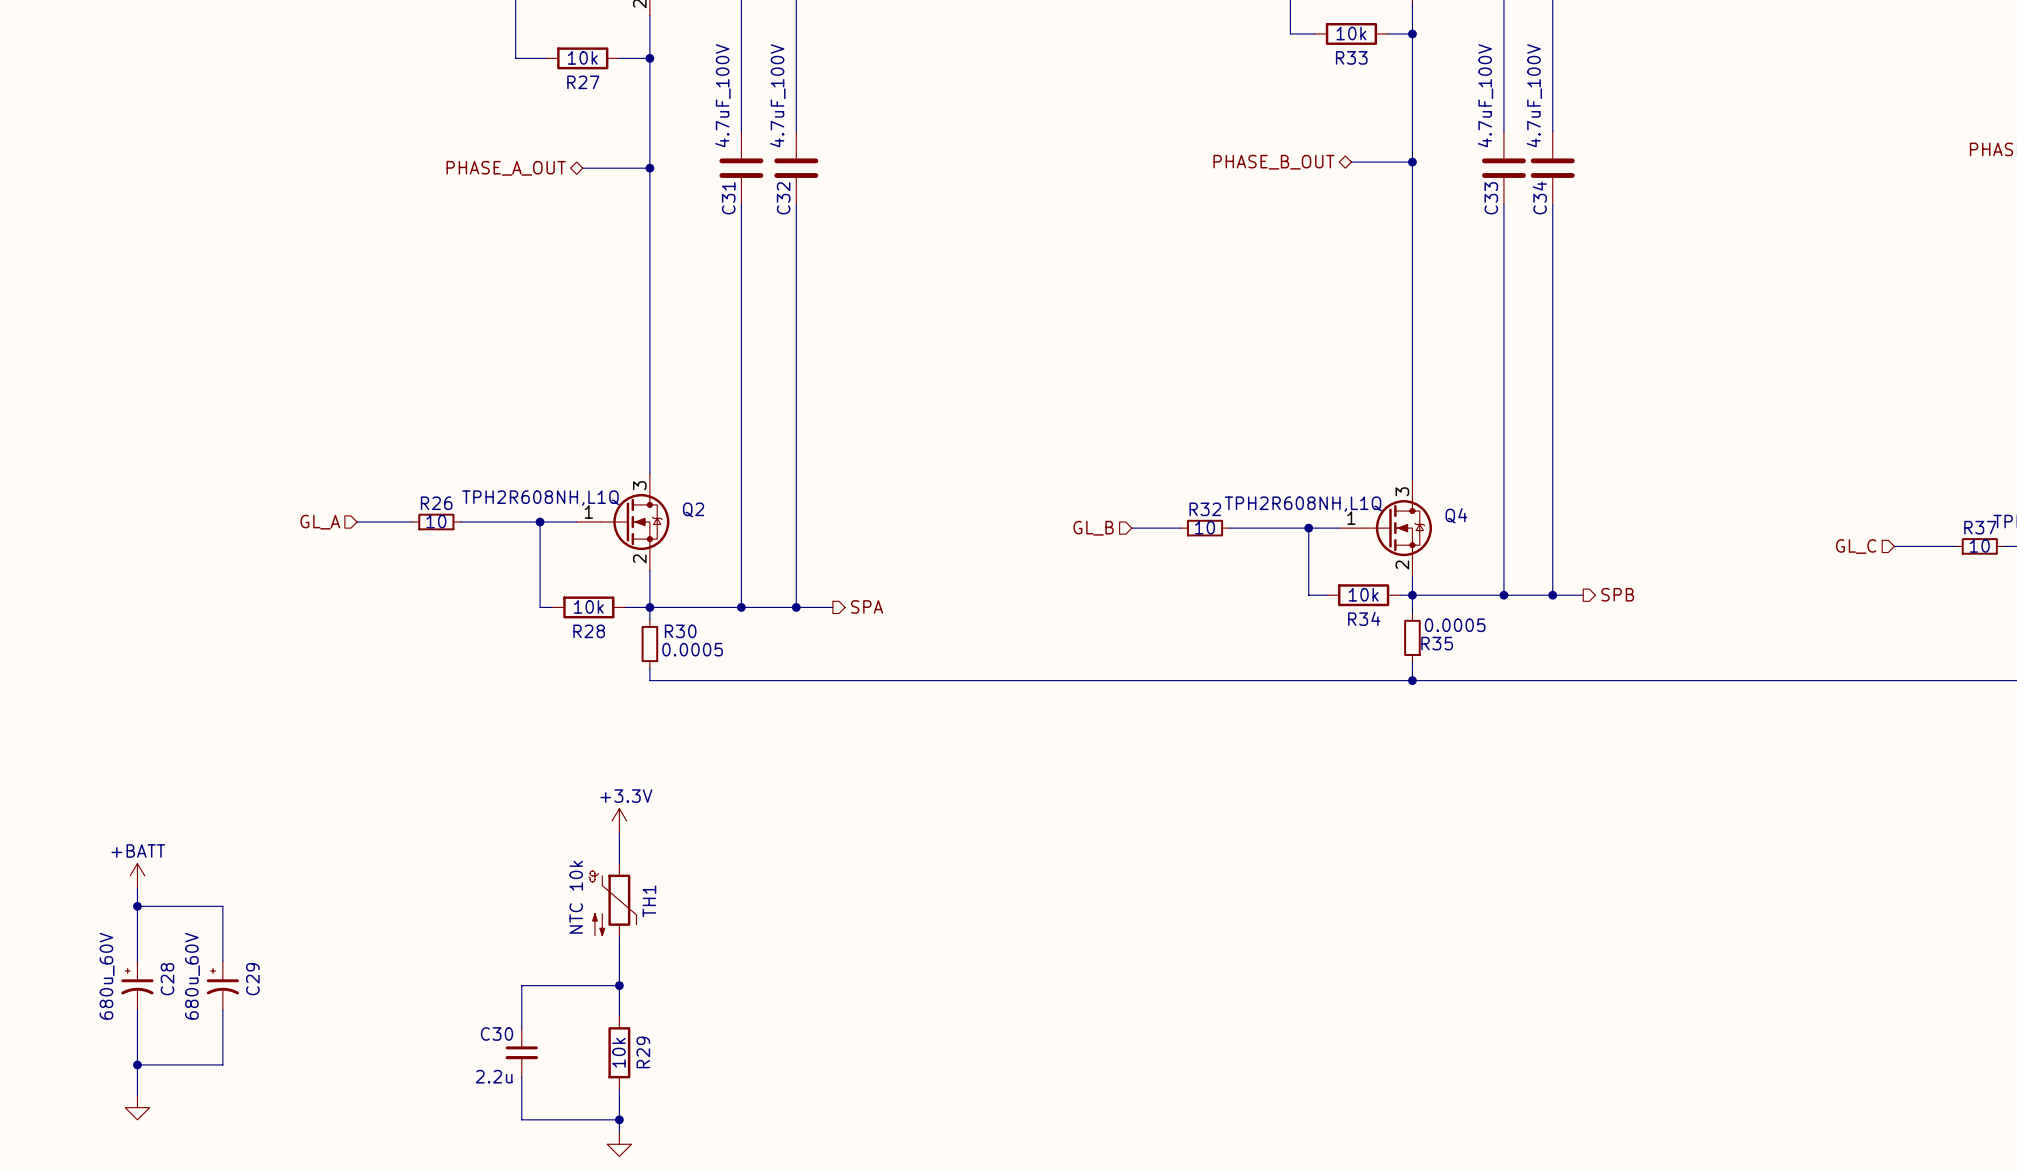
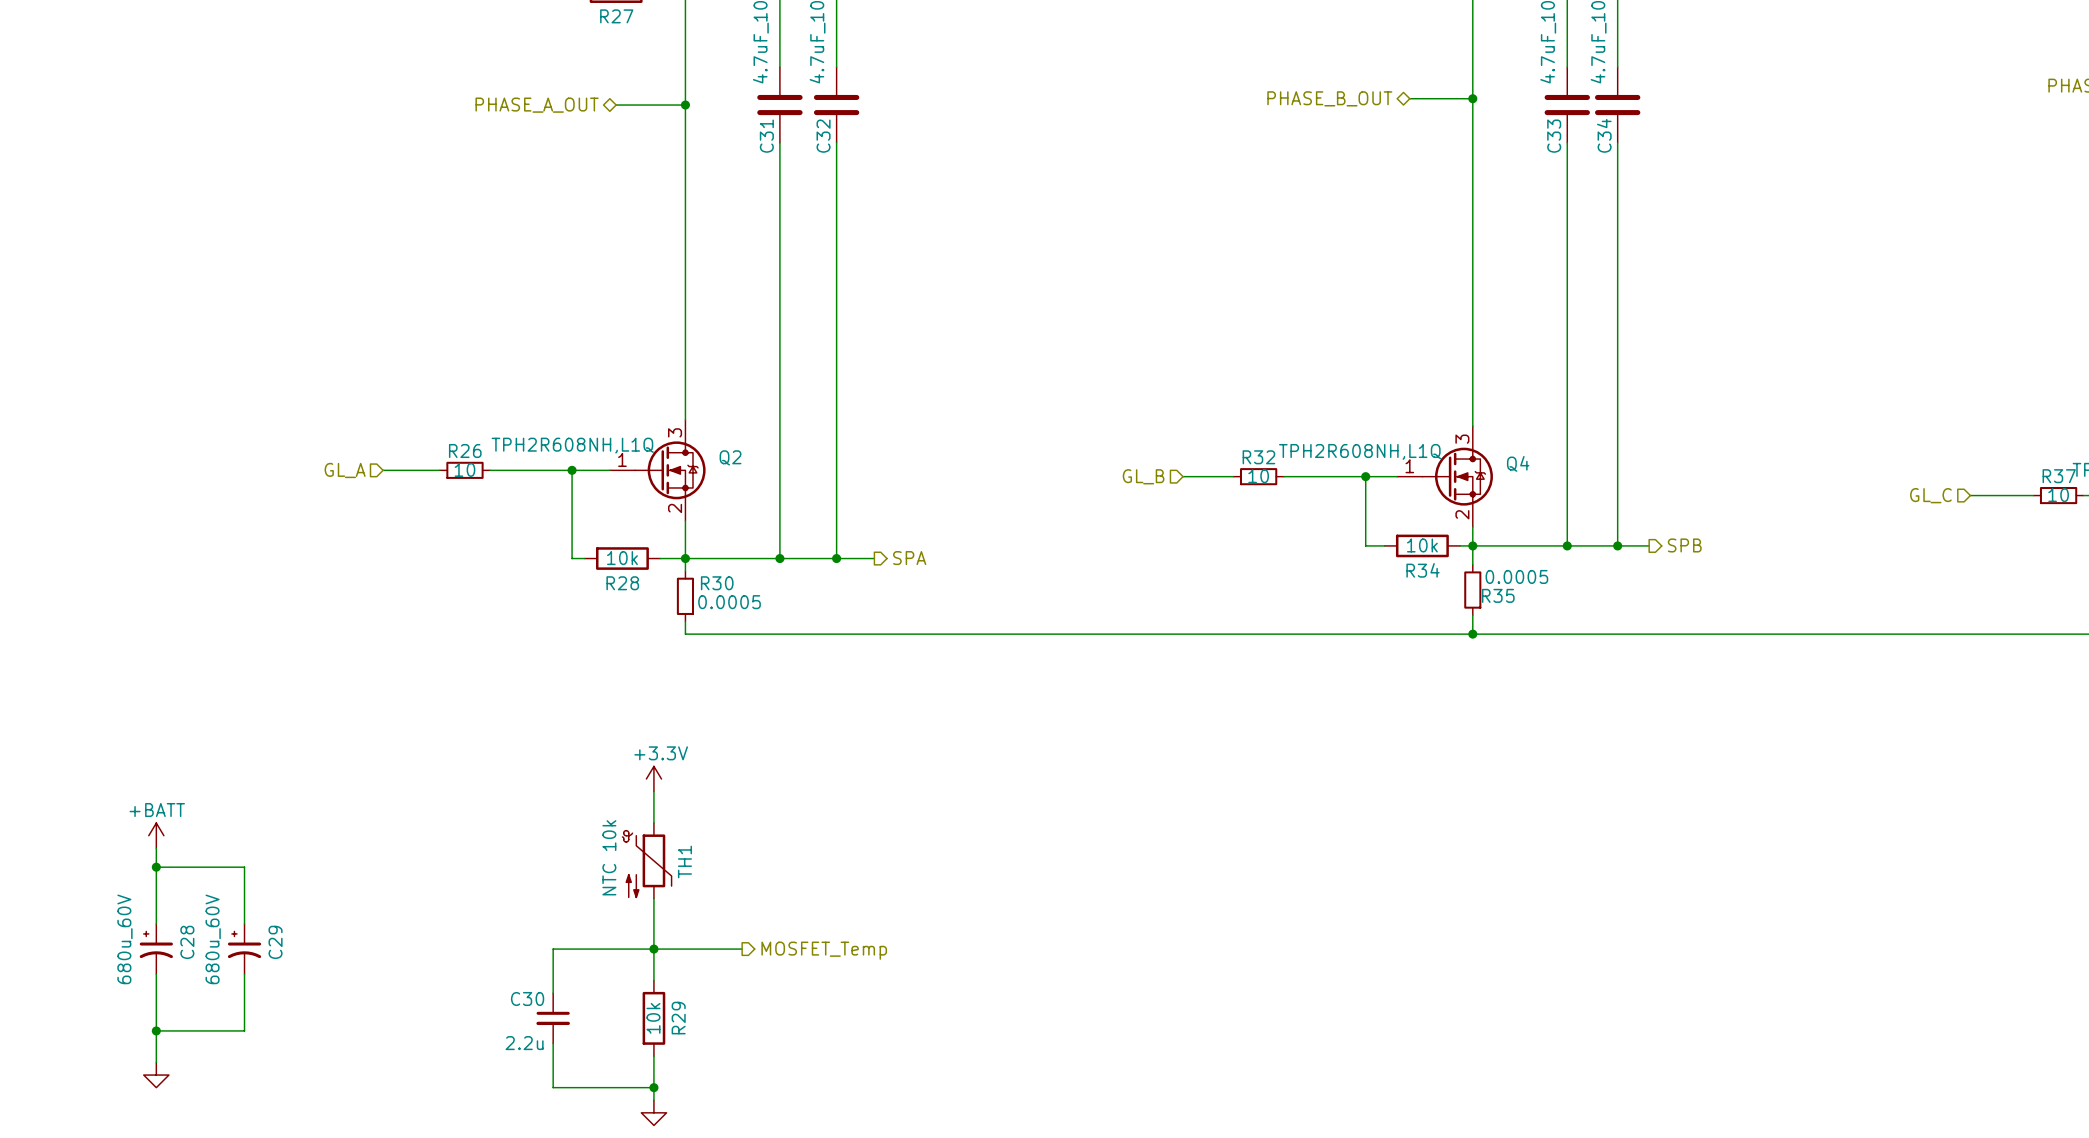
wire: none -> (653, 949) (742, 949)
hierarchical label: none -> MOSFET_Temp (824, 950)

